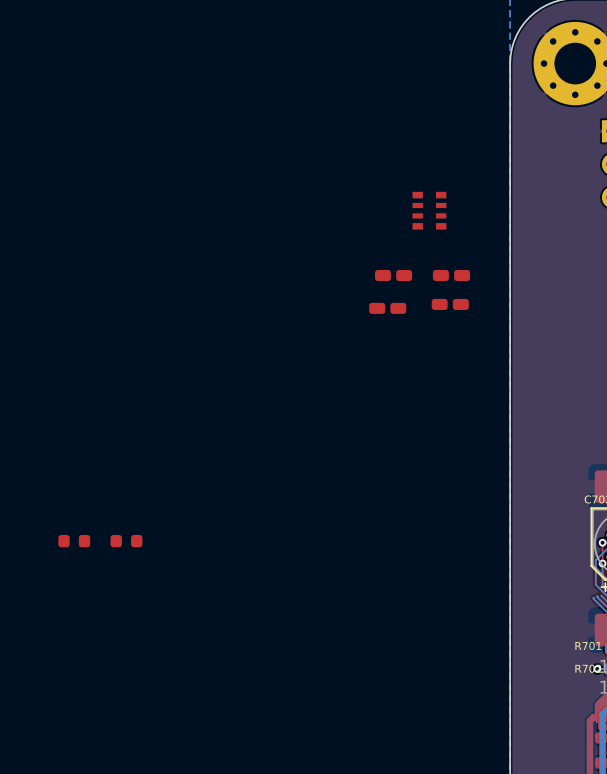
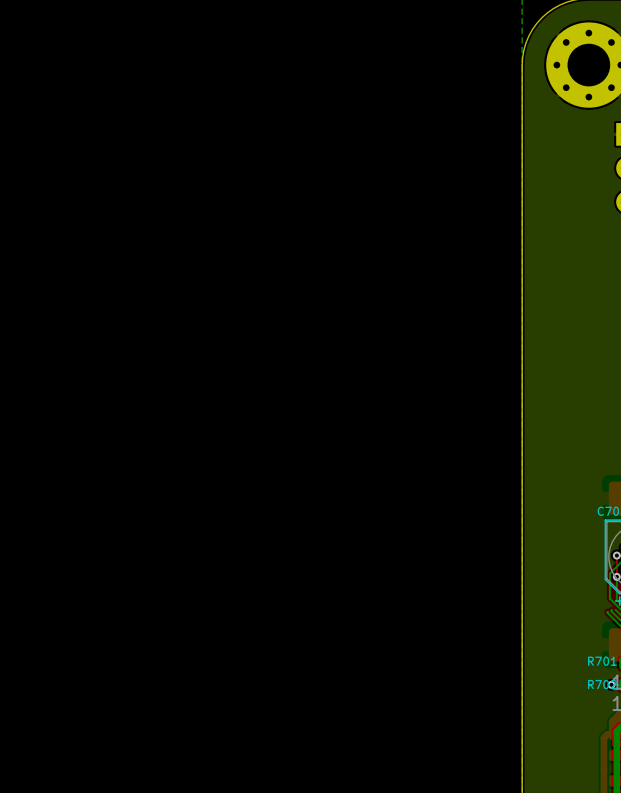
part: (429, 210) -> none
part: (393, 275) -> none
part: (451, 275) -> none
part: (450, 304) -> none
part: (387, 308) -> none
part: (74, 541) -> none
part: (126, 541) -> none

